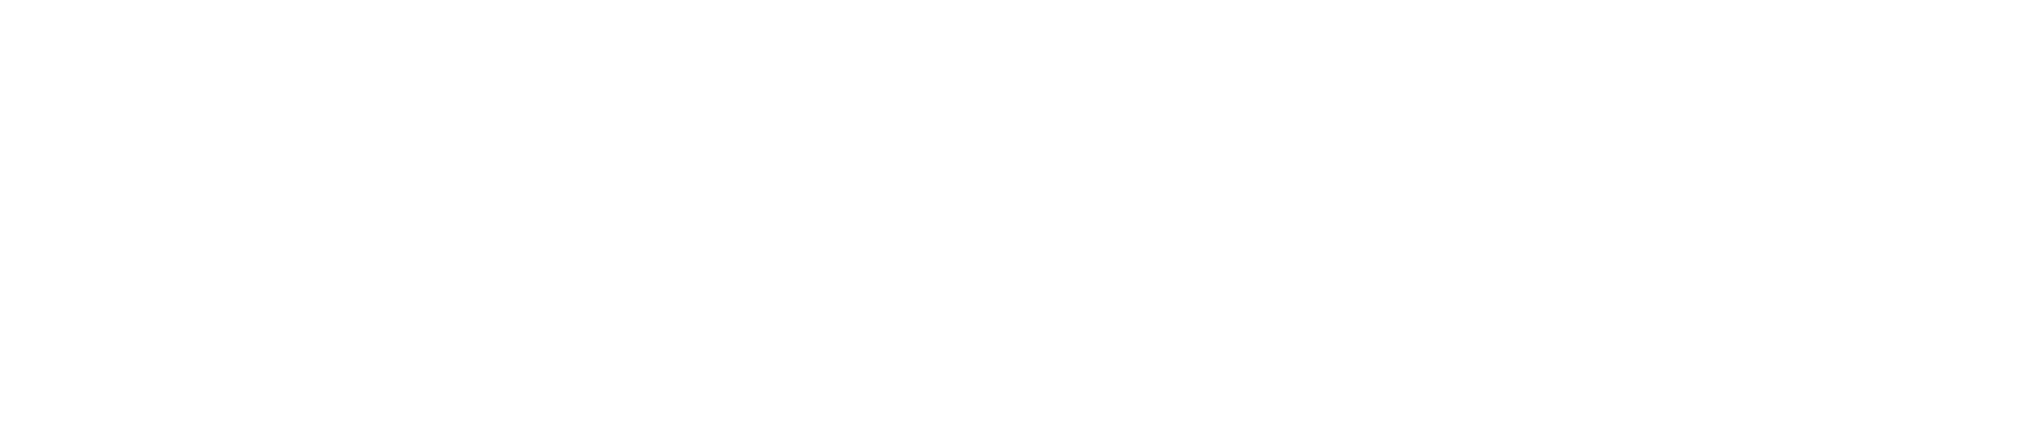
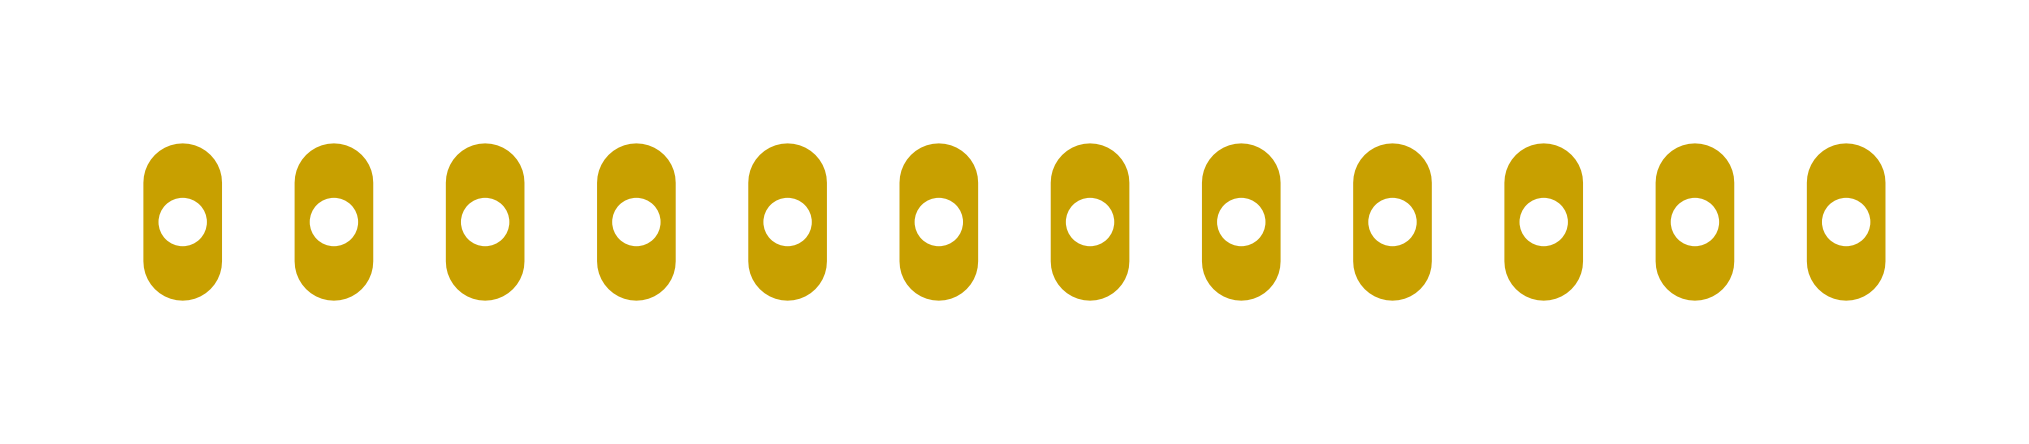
part: none -> (333, 222)
part: none -> (787, 222)
part: none -> (1241, 222)
part: none -> (1694, 222)

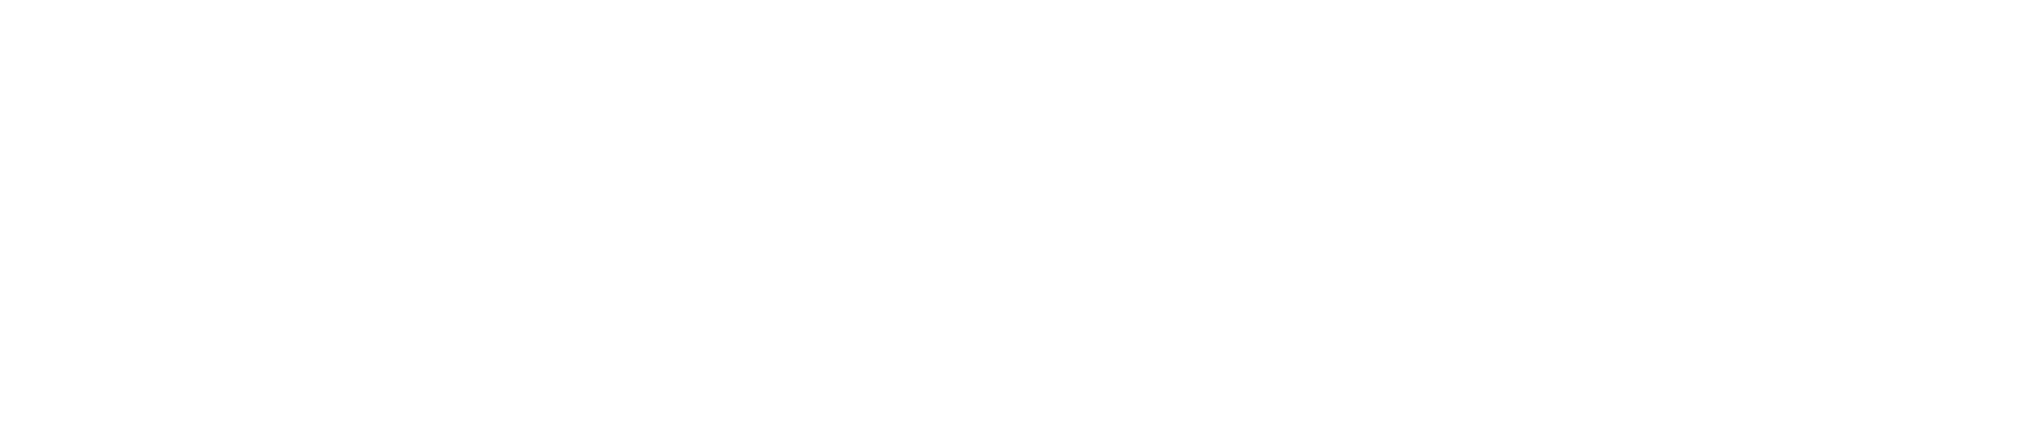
part: (333, 222) -> none
part: (787, 222) -> none
part: (1241, 222) -> none
part: (1694, 222) -> none

